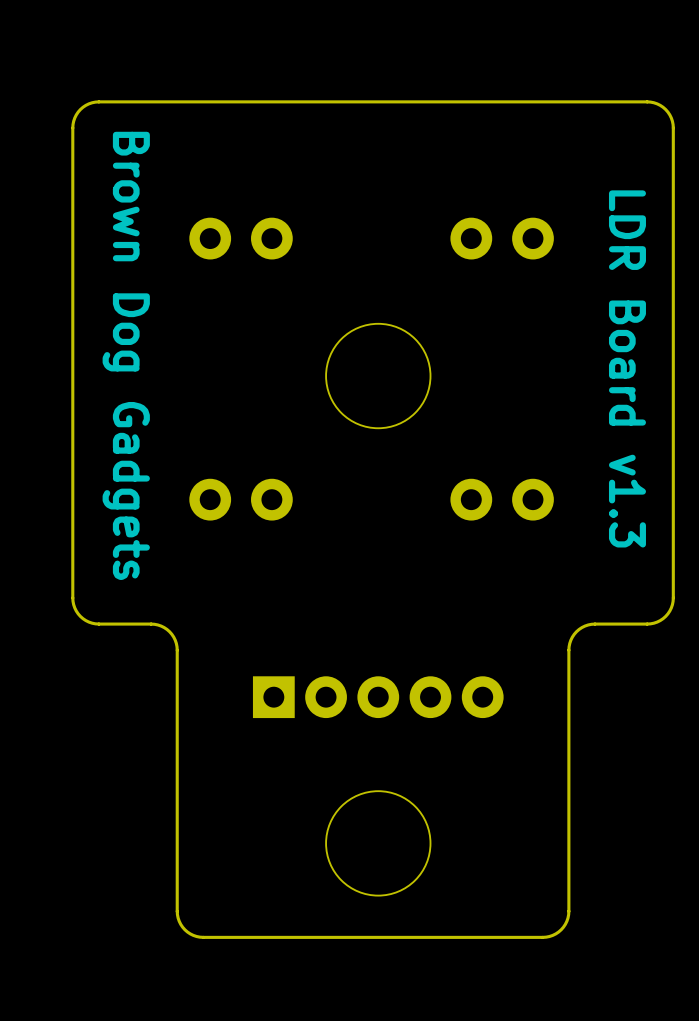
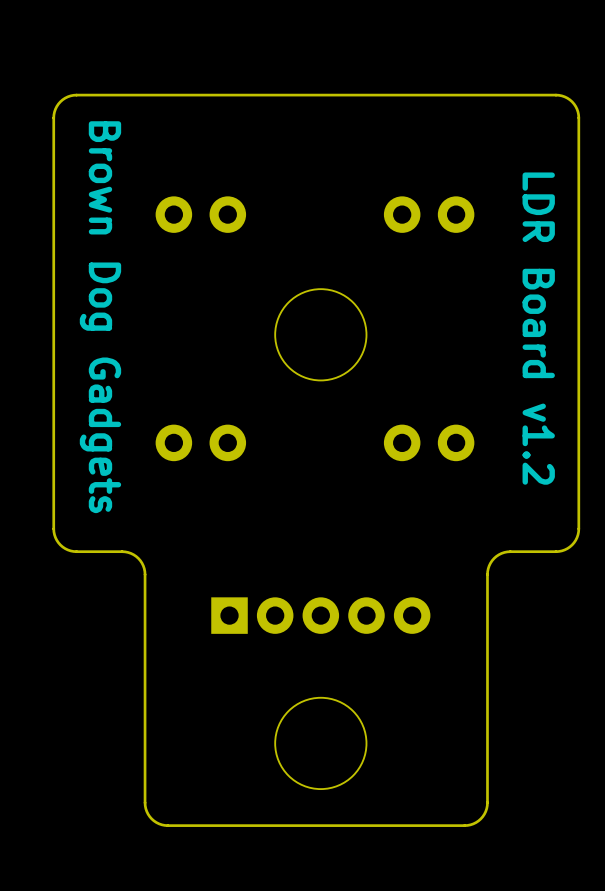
text: LDR Board v1.3 (627, 368) -> LDR Board v1.2 (538, 328)

